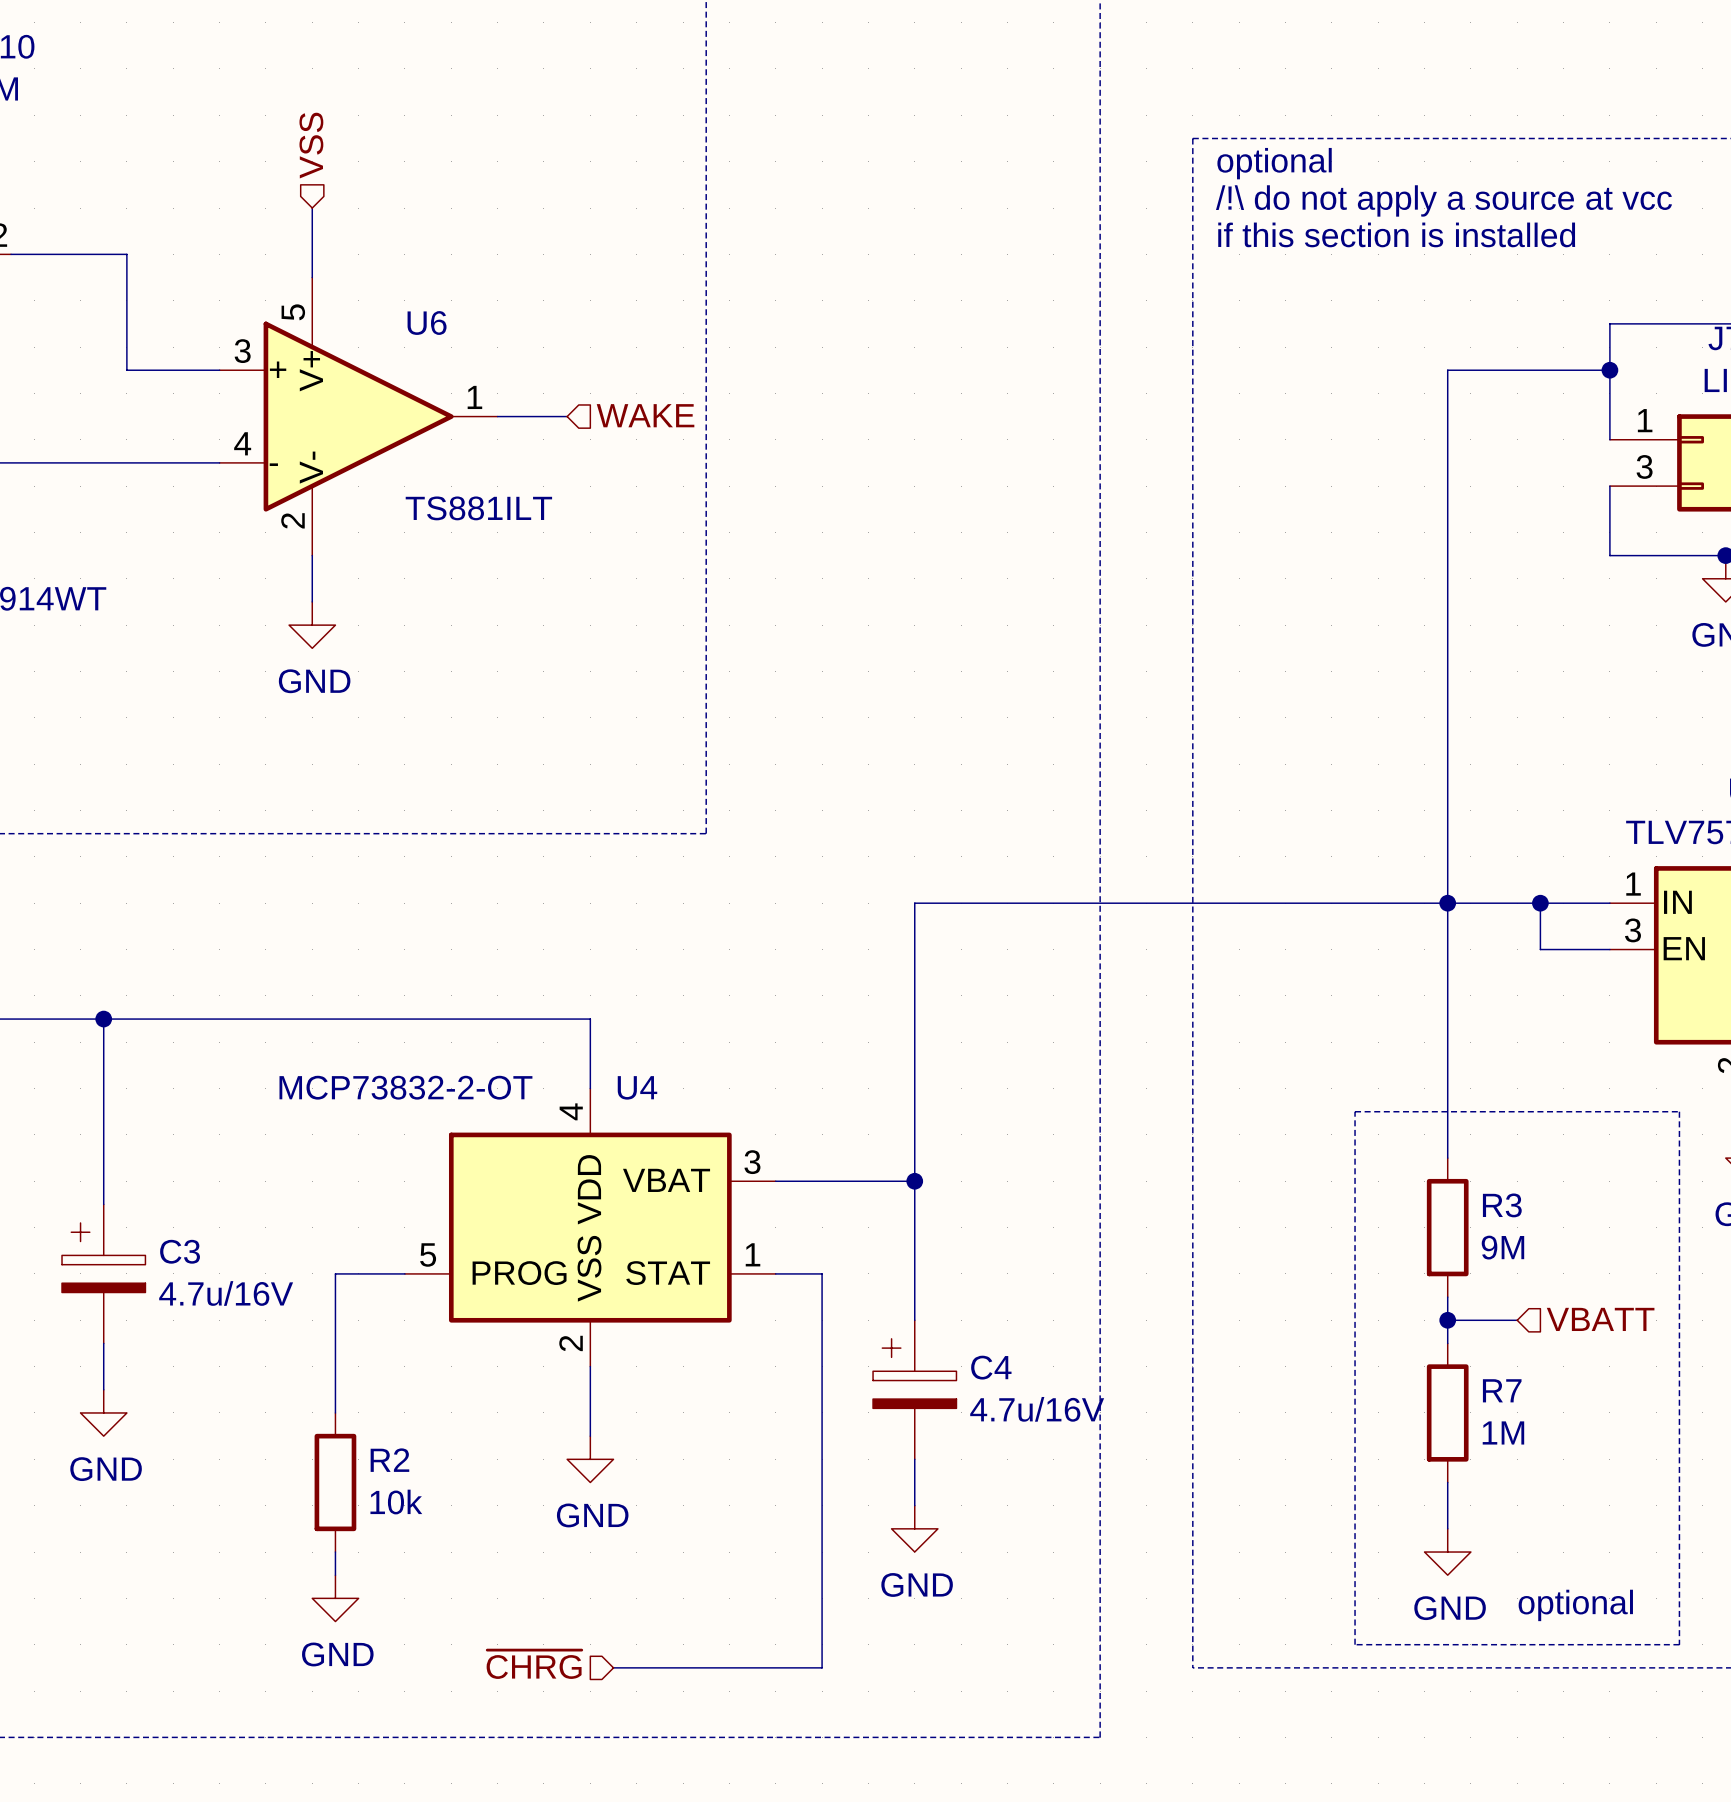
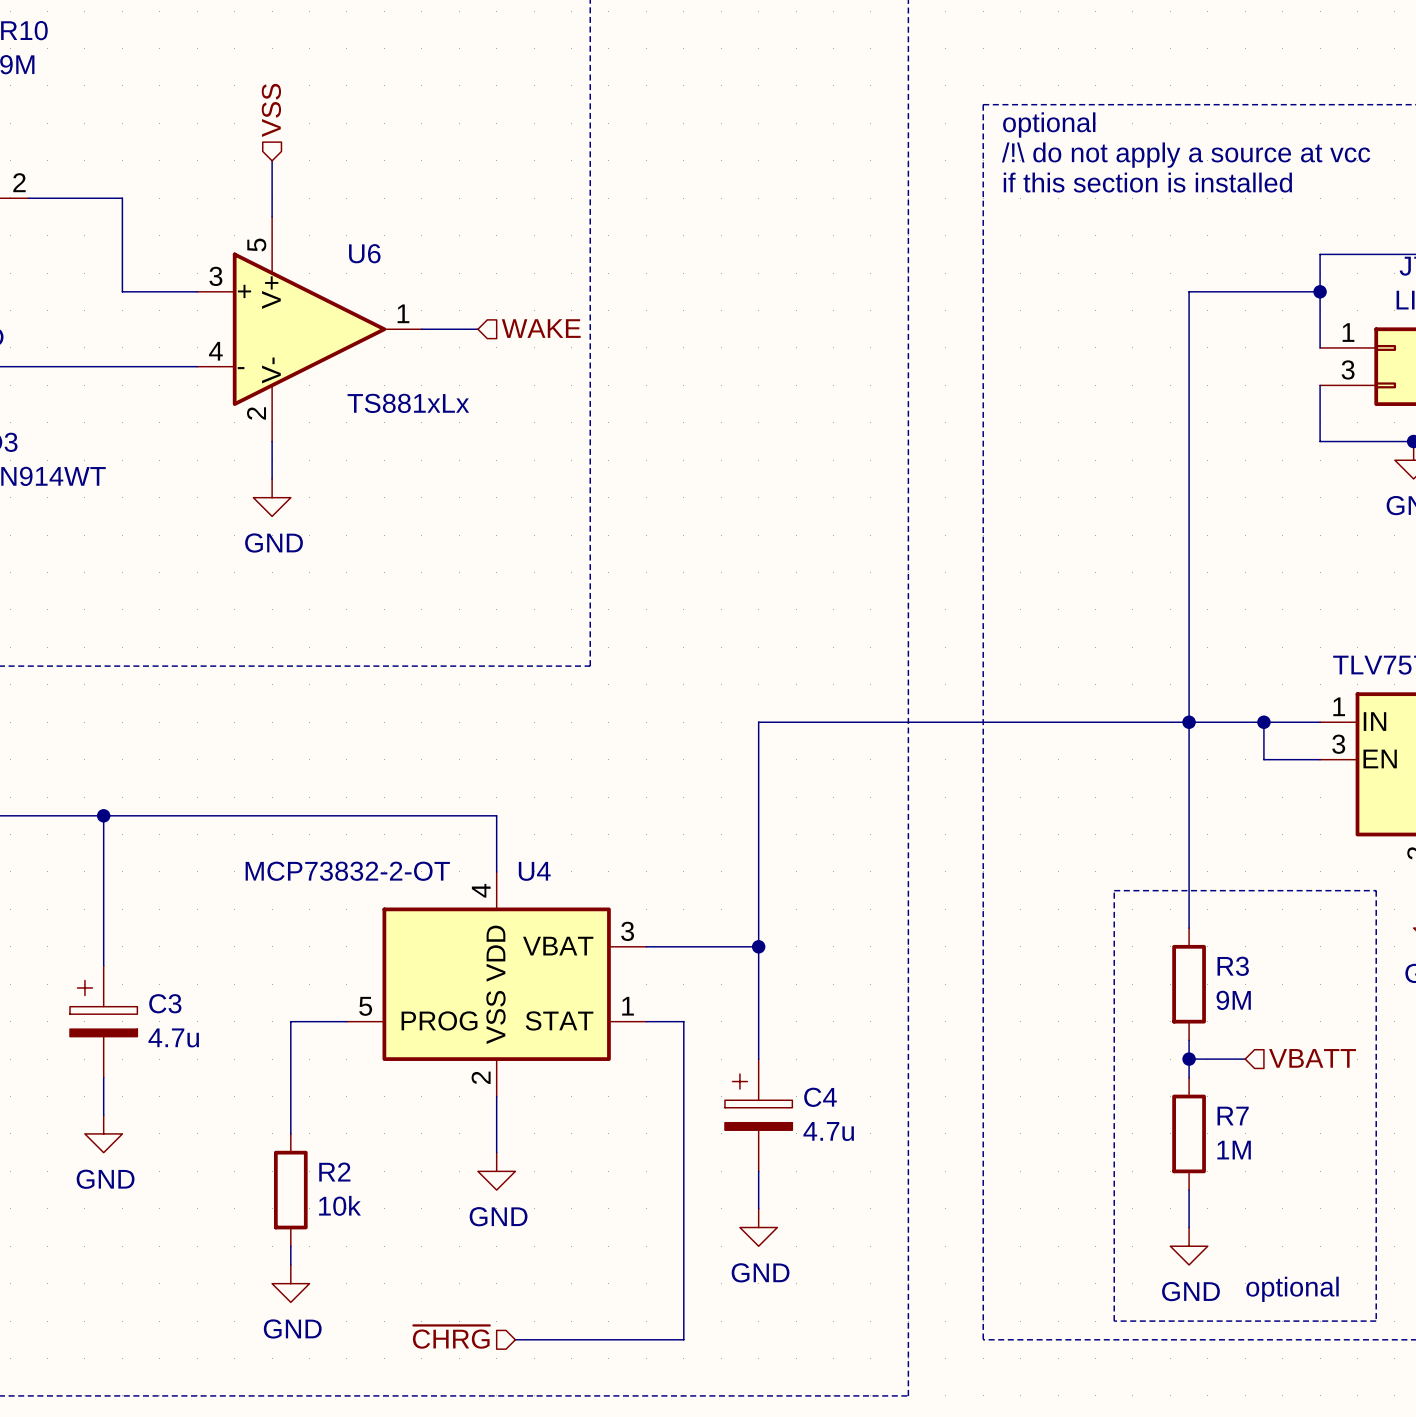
U6 value: TS881ILT (478, 508) -> TS881xLx (408, 403)
C3 value: 4.7u/16V (226, 1293) -> 4.7u (173, 1037)
C4 value: 4.7u/16V (1037, 1409) -> 4.7u (828, 1131)

